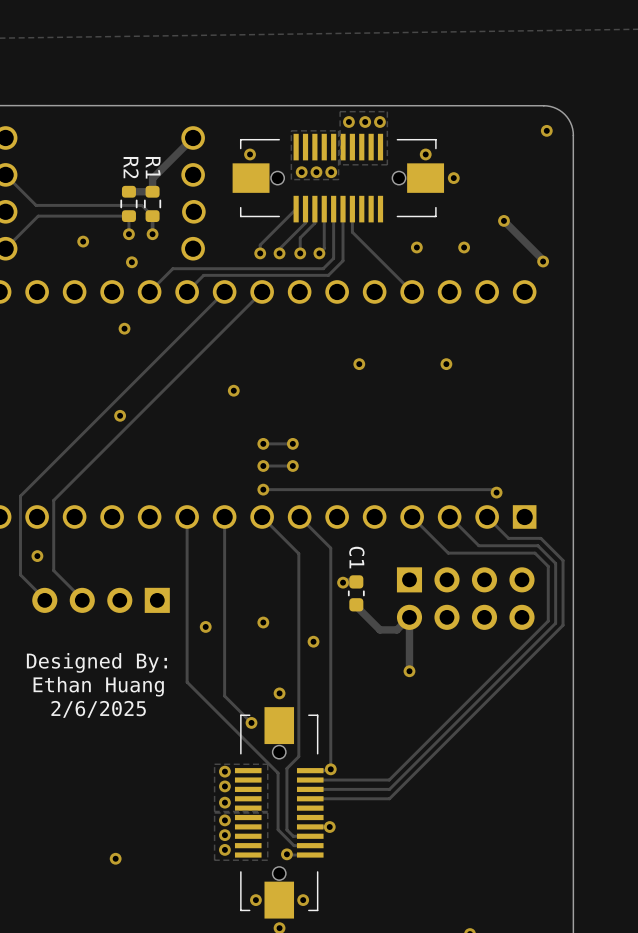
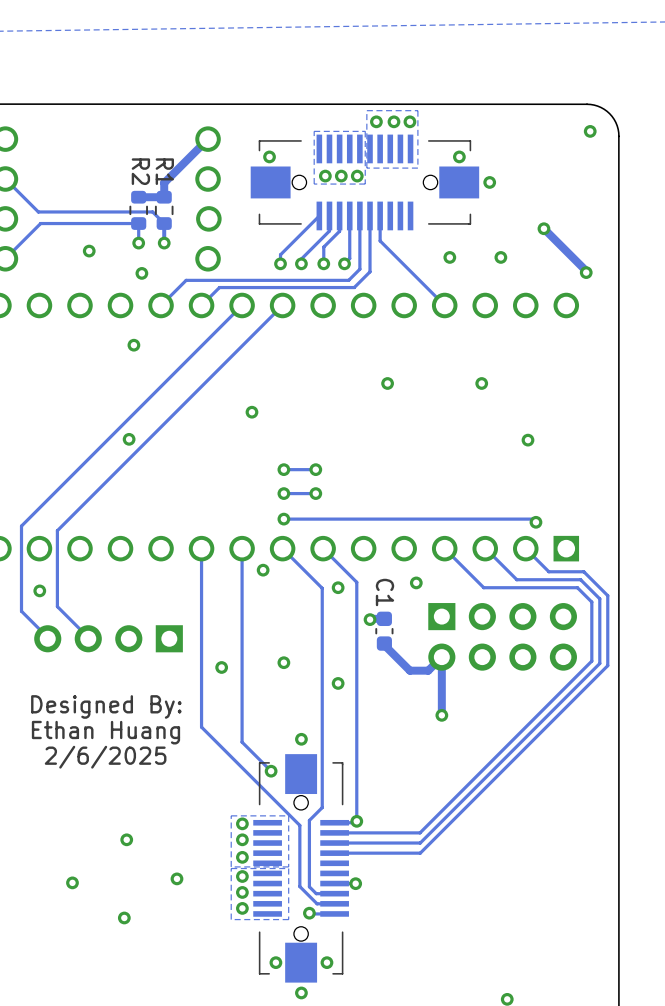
via: none -> (527, 440)
via: none -> (263, 570)
via: none -> (416, 582)
via: none -> (338, 587)
via: none -> (126, 839)
via: none -> (176, 878)
via: none -> (72, 882)

